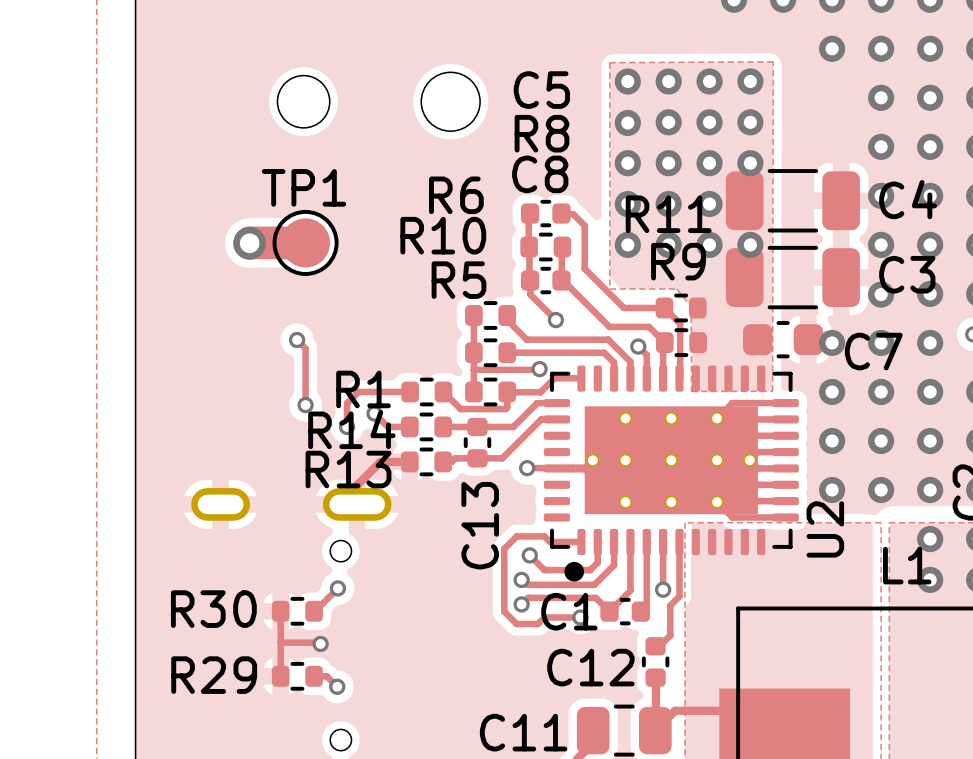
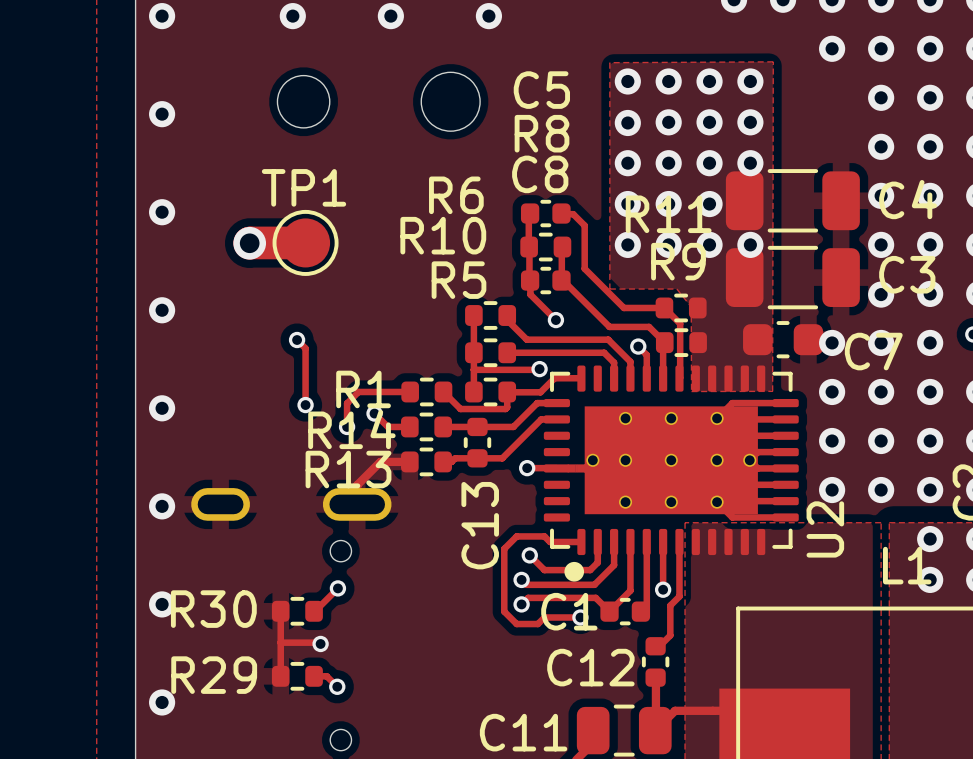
via: none -> (162, 16)
via: none -> (292, 16)
via: none -> (390, 16)
via: none -> (488, 16)
via: none -> (162, 114)
via: none -> (162, 212)
via: none -> (162, 310)
via: none -> (162, 408)
via: none -> (162, 506)
via: none -> (162, 604)
via: none -> (162, 702)

